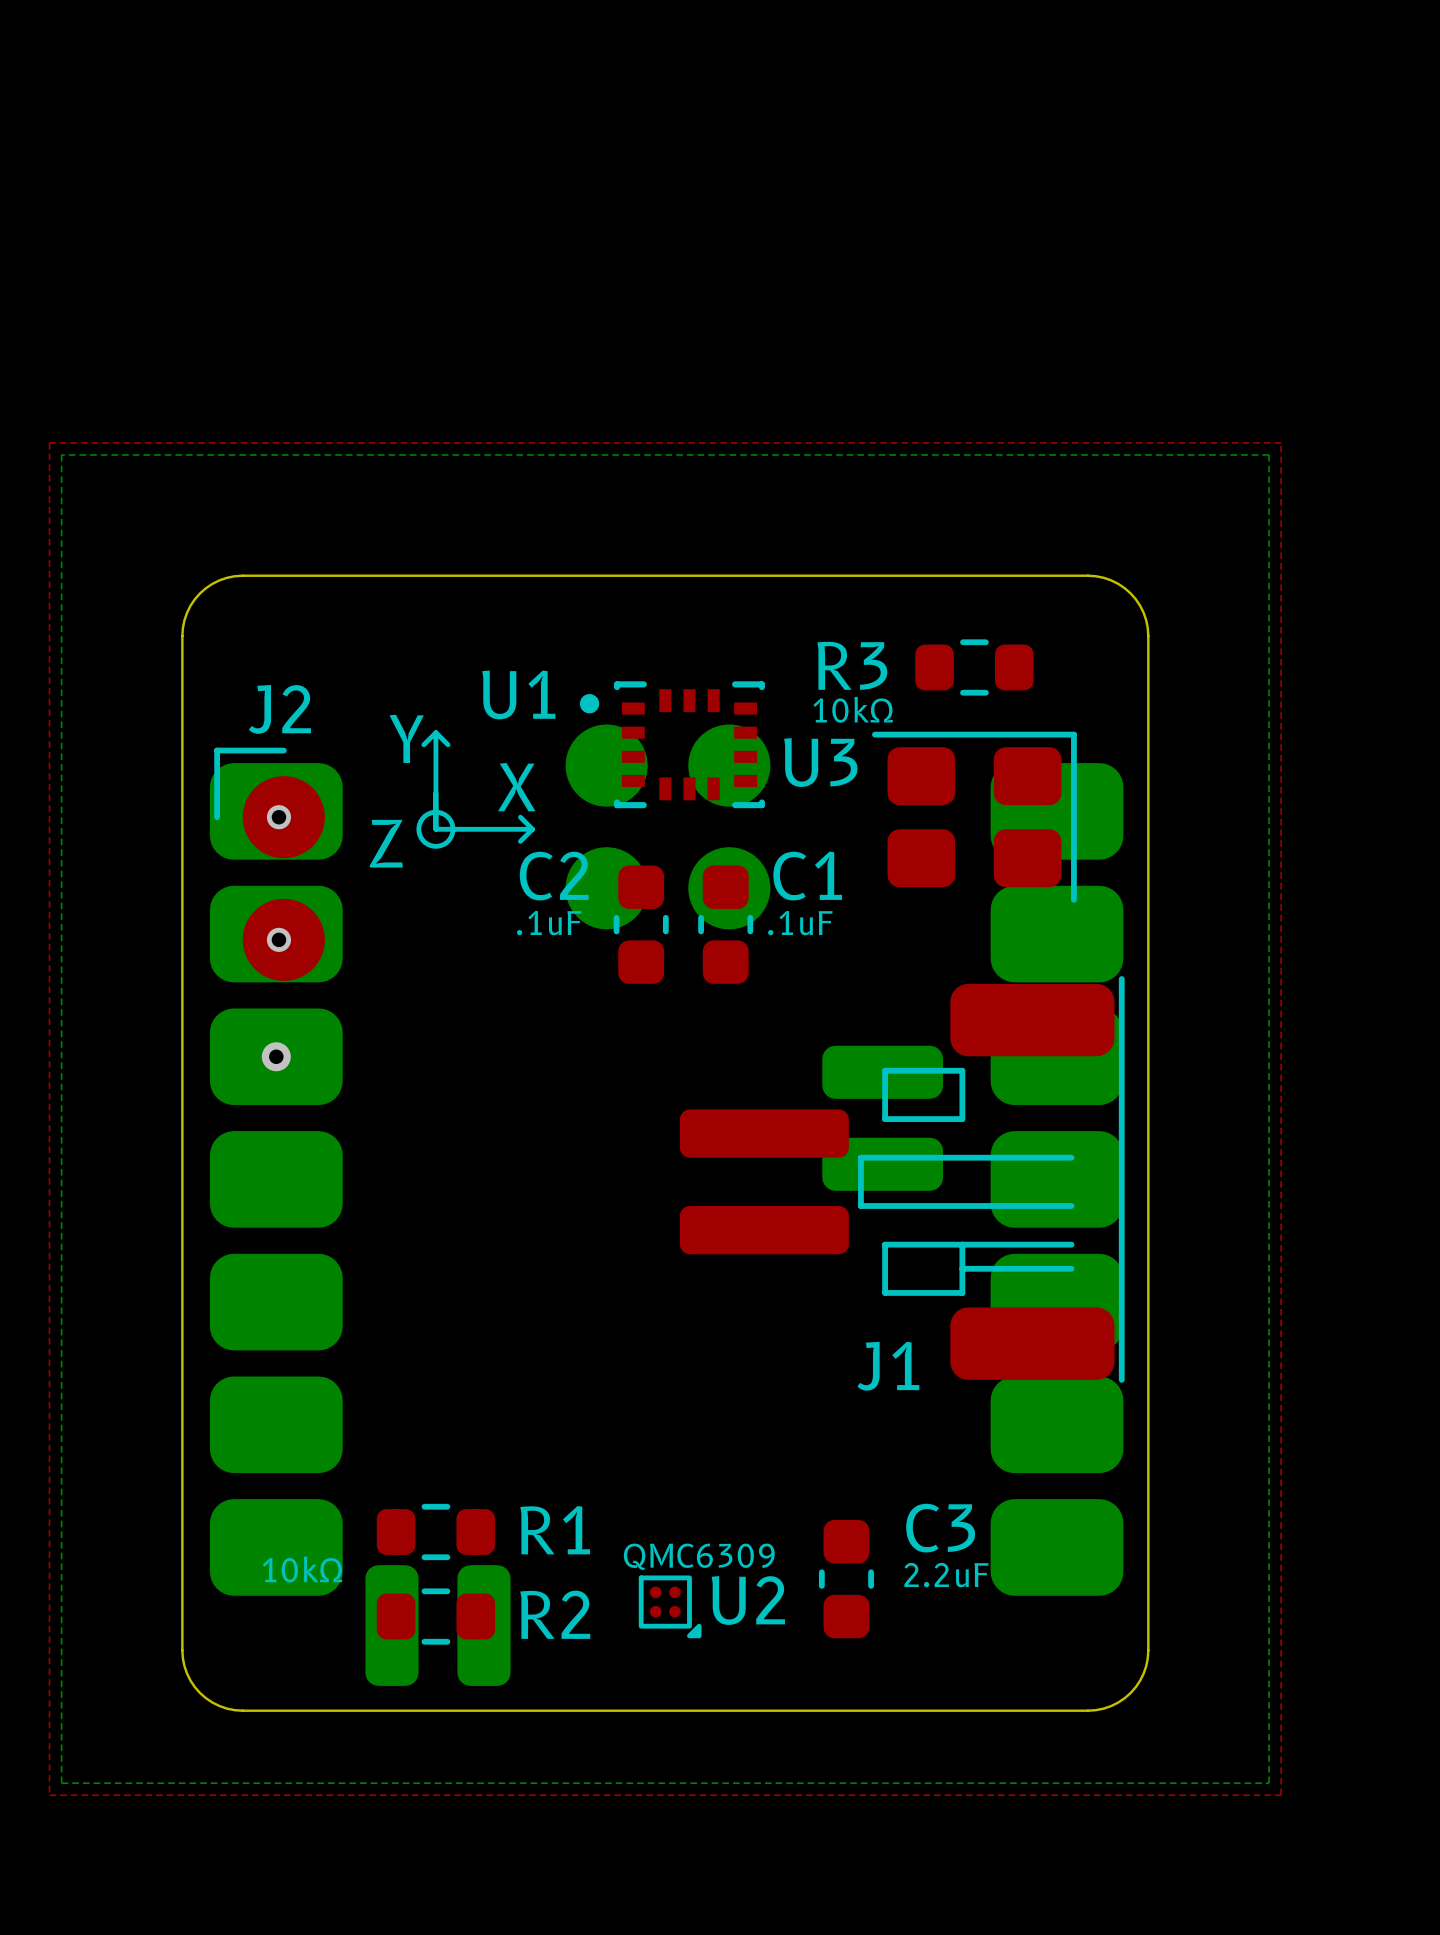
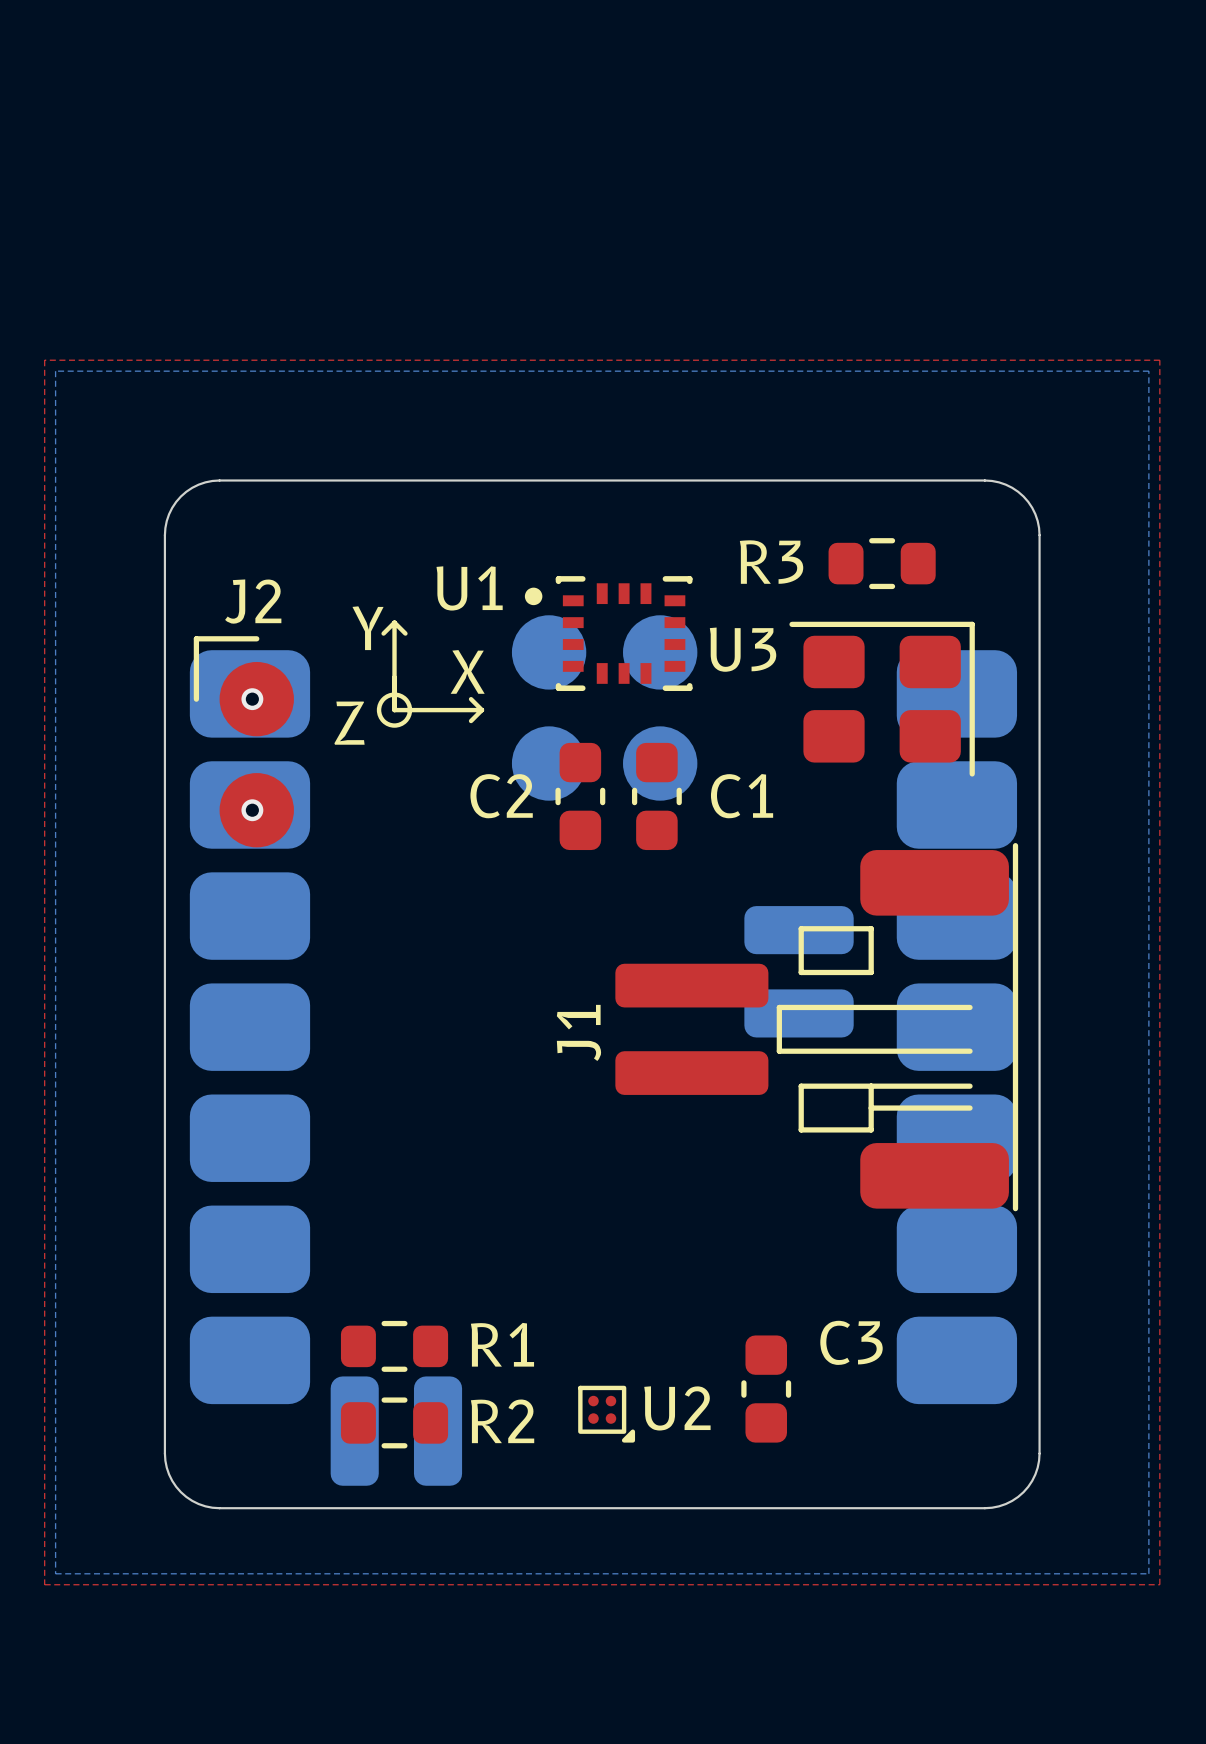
text: 10kΩ (853, 709) -> none
C2 name position: C2 (554, 876) -> C2 (501, 796)
C1 name position: C1 (807, 876) -> C1 (742, 796)
text: .1uF (549, 923) -> none
text: .1uF (800, 923) -> none
via: (276, 1056) -> none
J1 name rotation: 0° (888, 1366) -> 90° counterclockwise (578, 1032)
J1 name position: J1 (888, 1366) -> J1 (578, 1032)
text: QMC6309 (699, 1556) -> none
text: 10kΩ (302, 1569) -> none
text: 2.2uF (946, 1575) -> none

